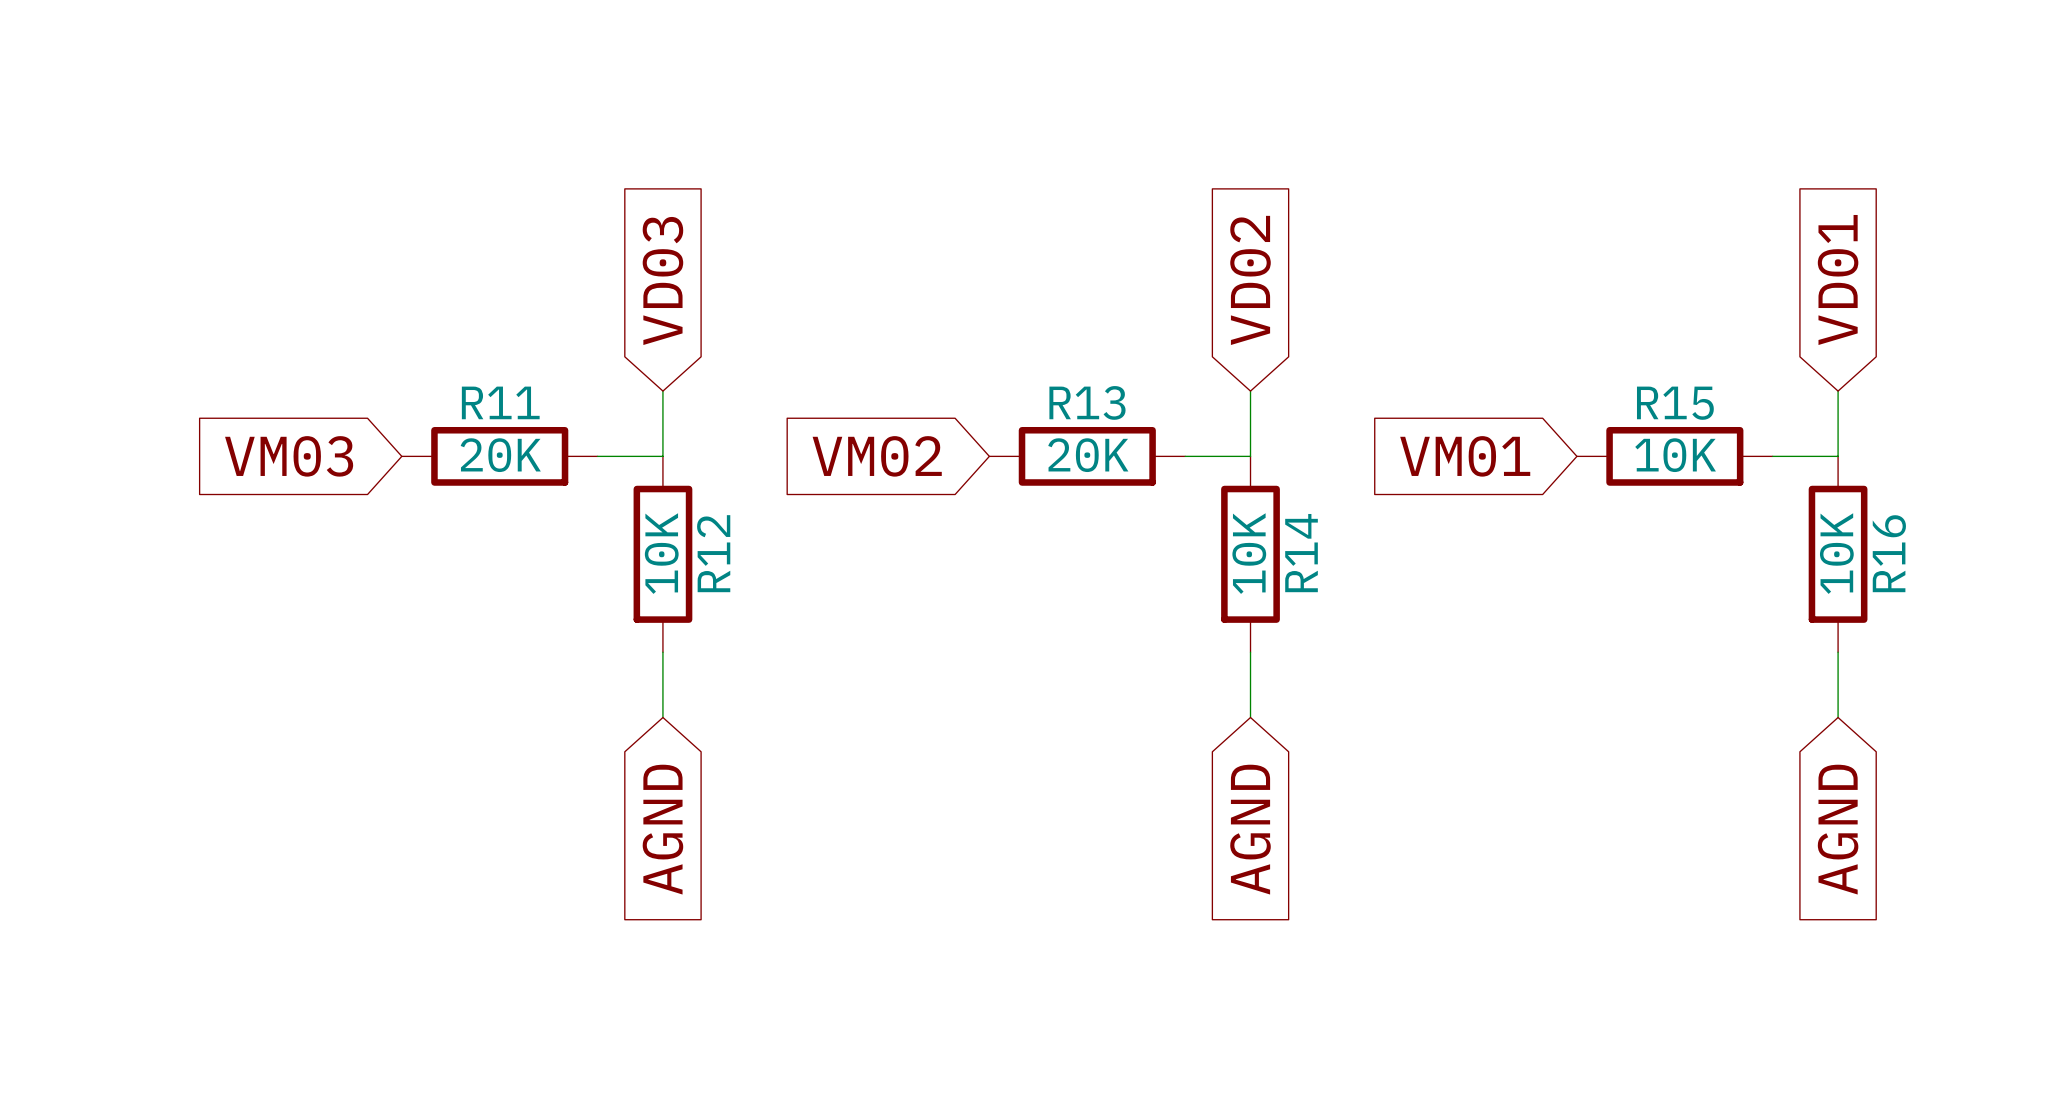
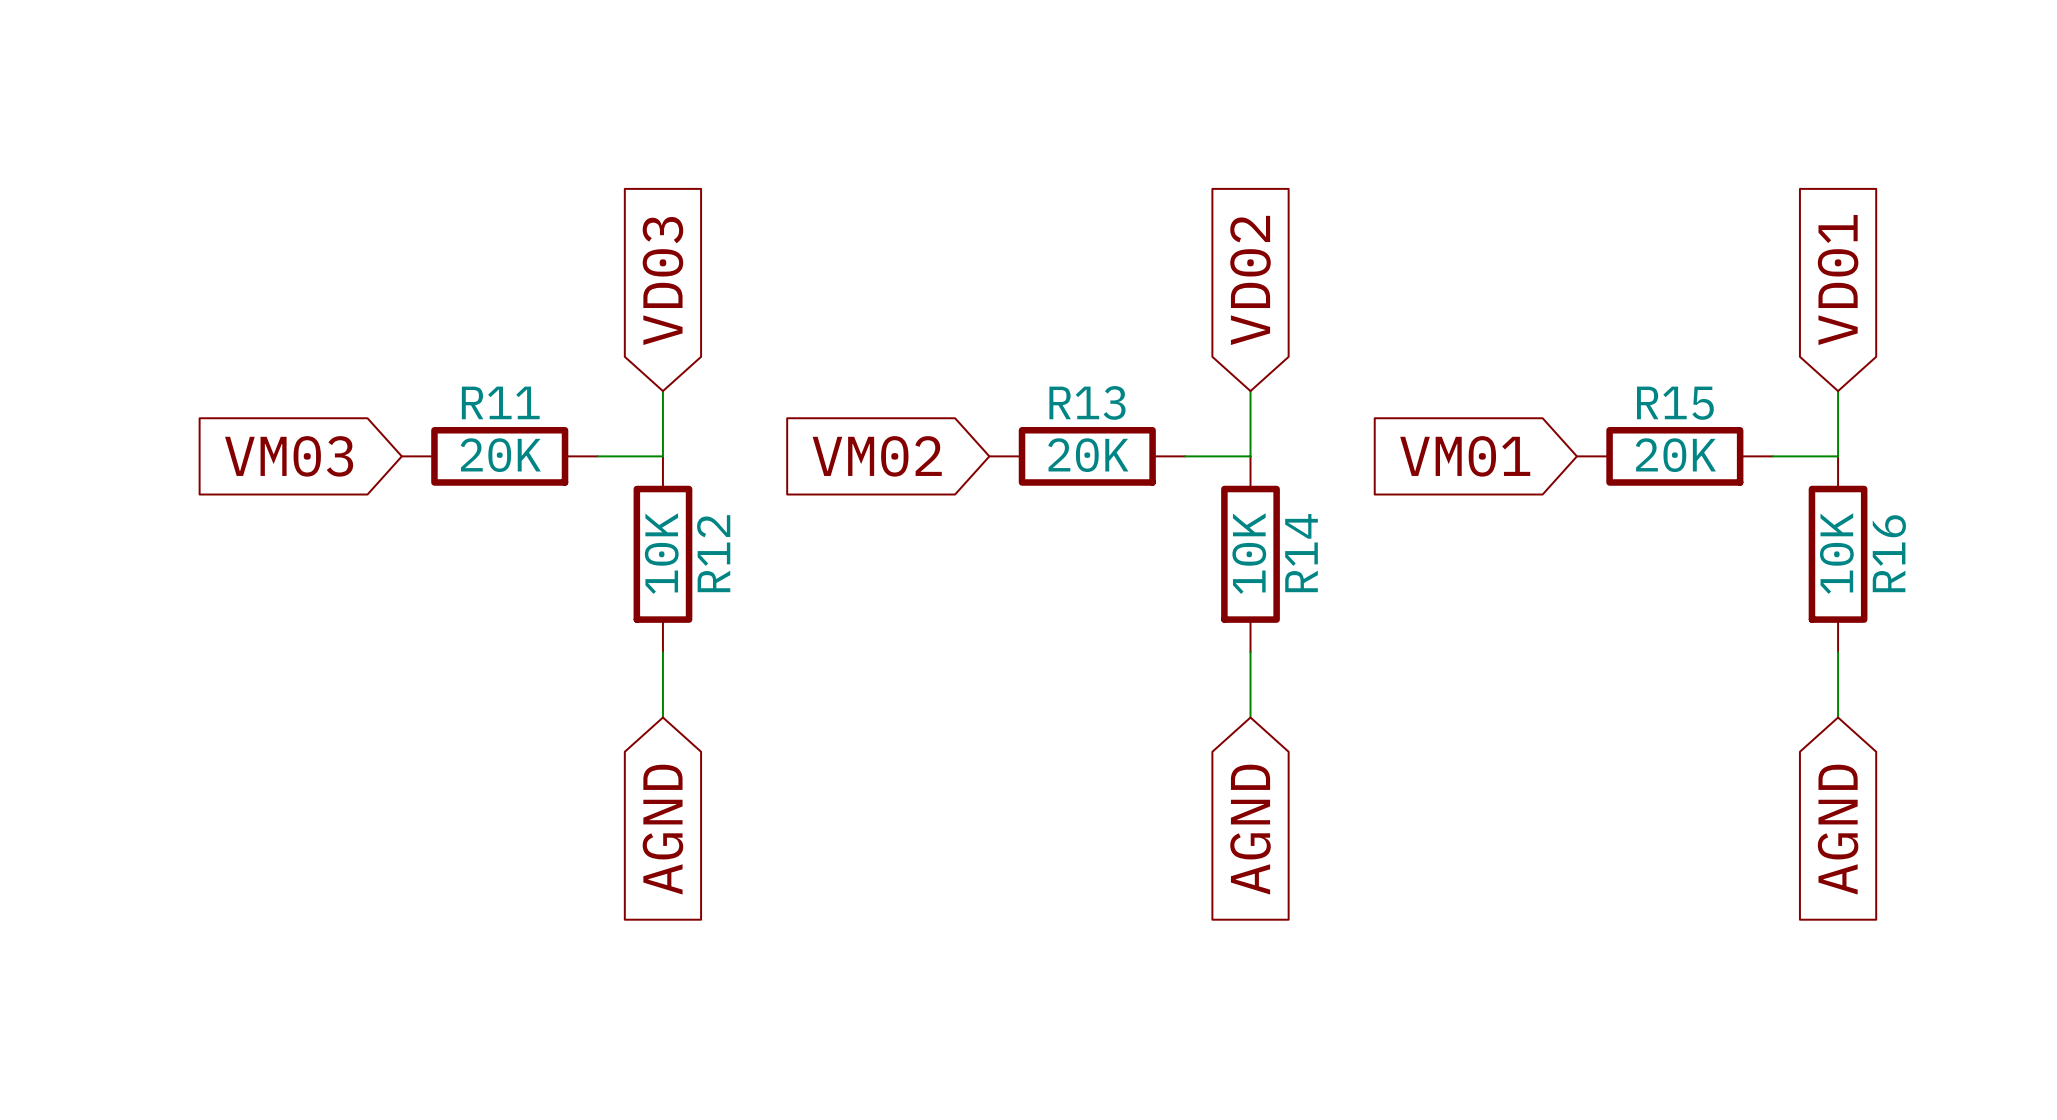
R15 value: 10K (1675, 455) -> 20K (1675, 455)

